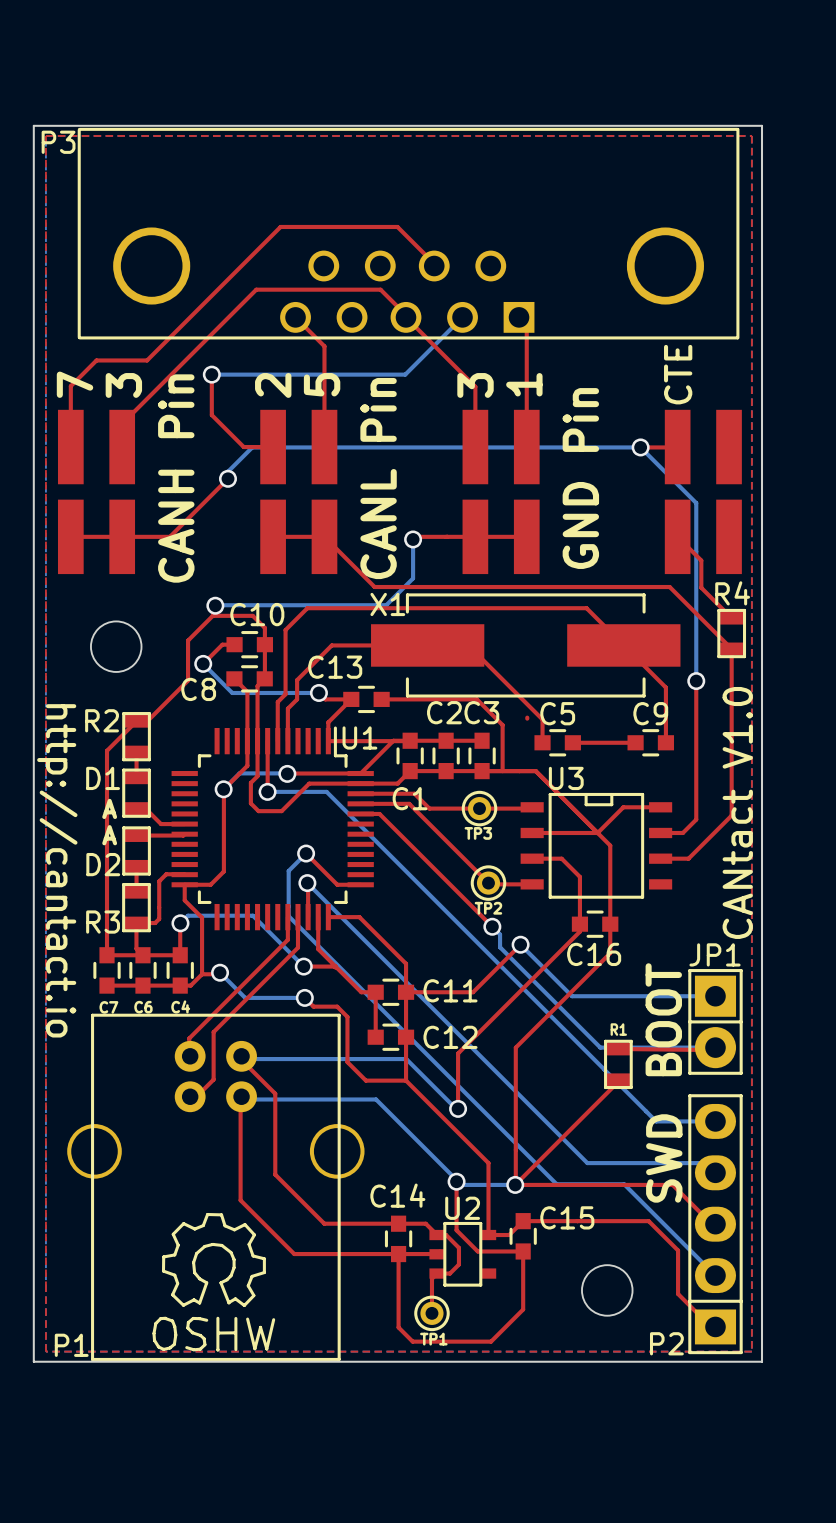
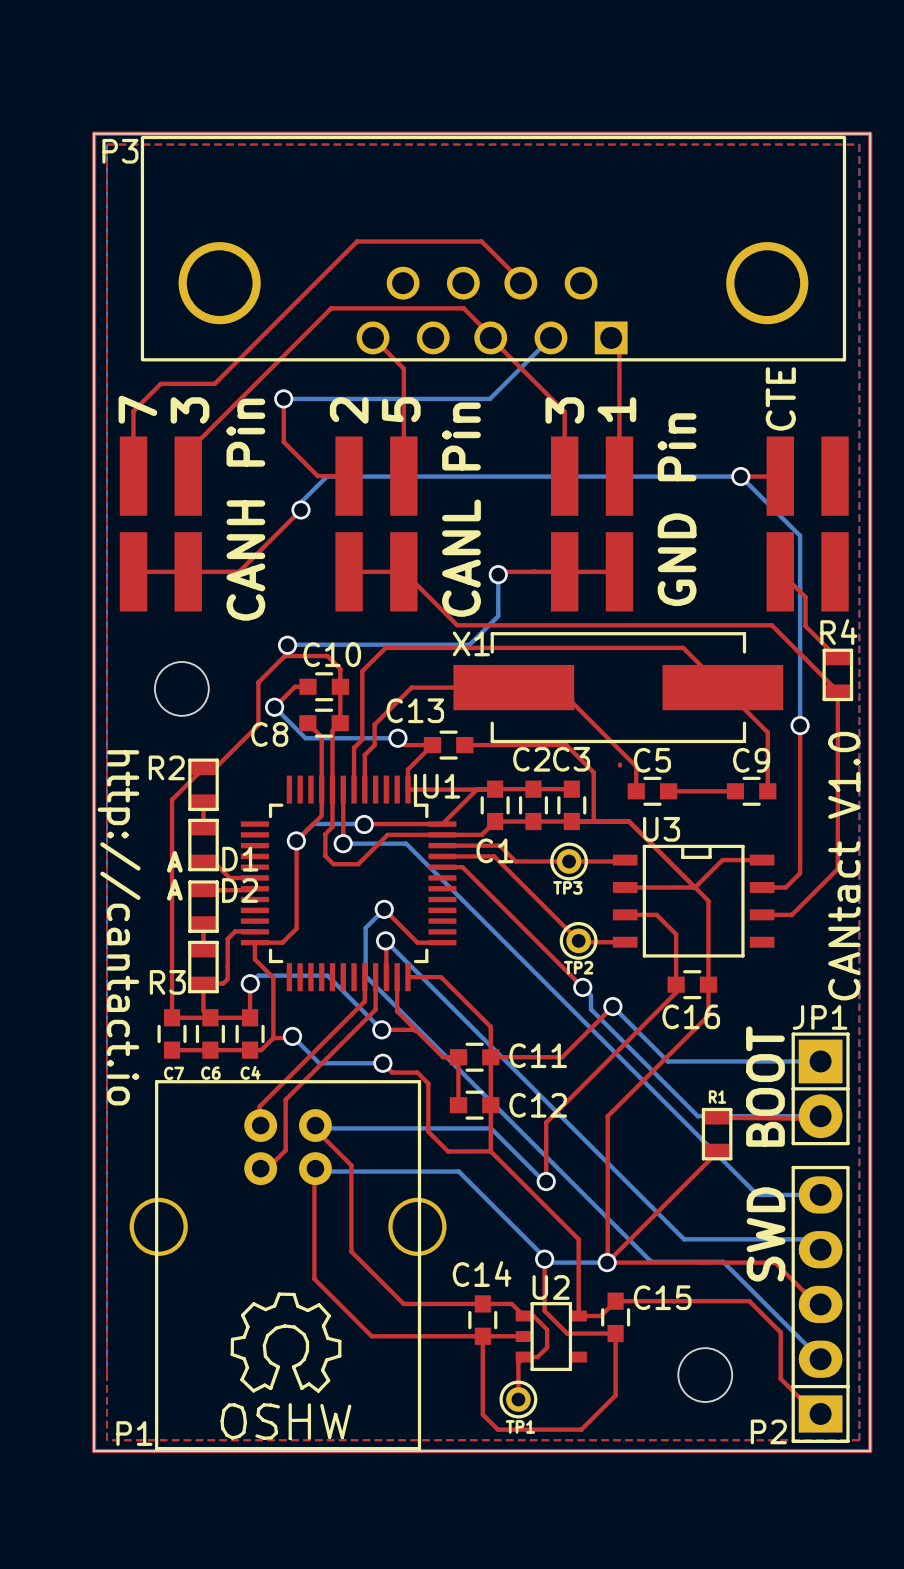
top track: none -> (94, 133) (870, 133) (870, 1451) (94, 1451) (94, 133)
D1 name position: D1 (103, 778) -> D1 (240, 859)
D2 name position: D2 (103, 864) -> D2 (240, 890)

